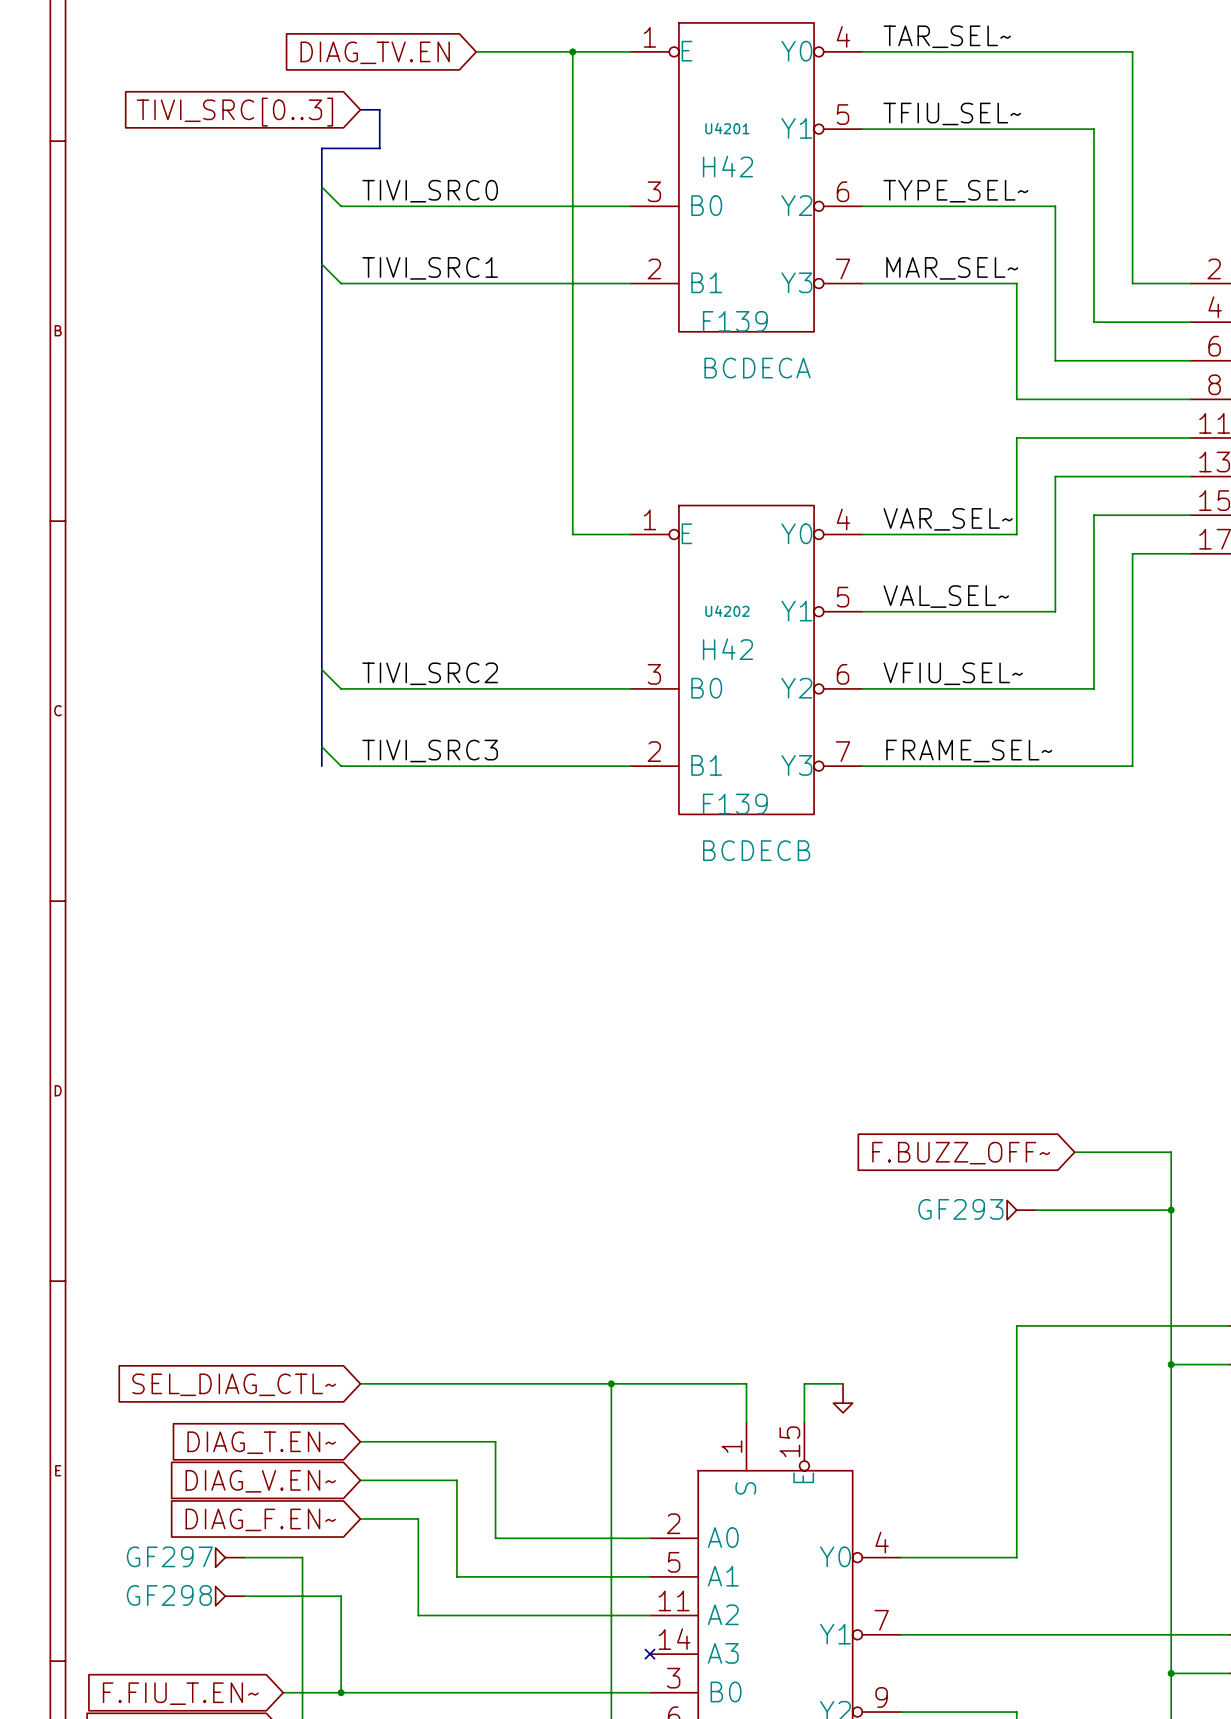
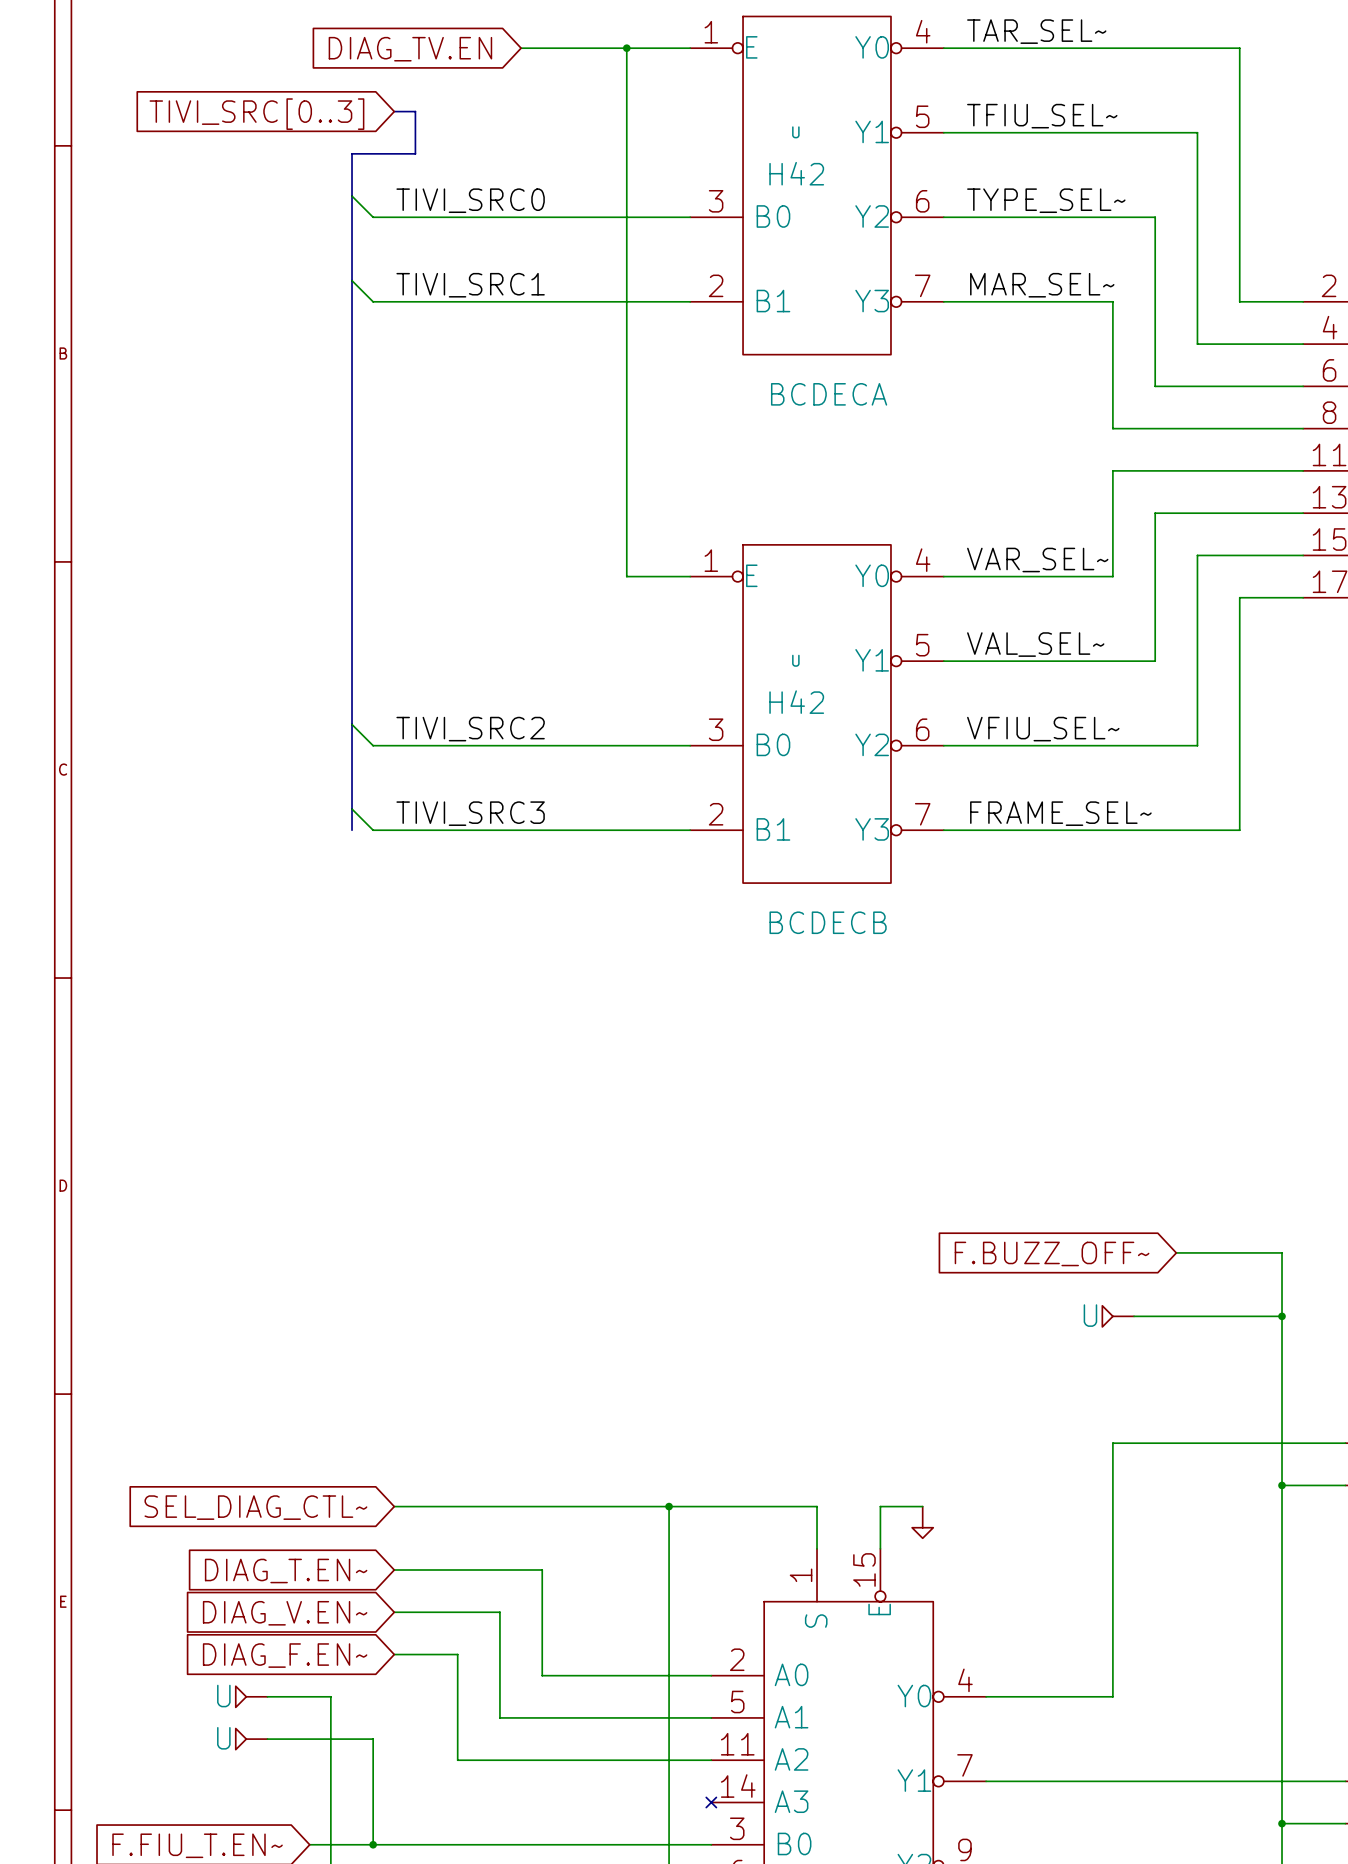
U4201 name: U4201 (727, 128) -> U (795, 132)
U4201 value: F139 (735, 321) -> none
U4202 name: U4202 (727, 611) -> U (795, 660)
U4202 value: F139 (735, 804) -> none
GF293 name: GF293 (960, 1209) -> U (1090, 1315)
GF297 name: GF297 (169, 1556) -> U (223, 1696)
GF298 name: GF298 (169, 1595) -> U (223, 1738)

